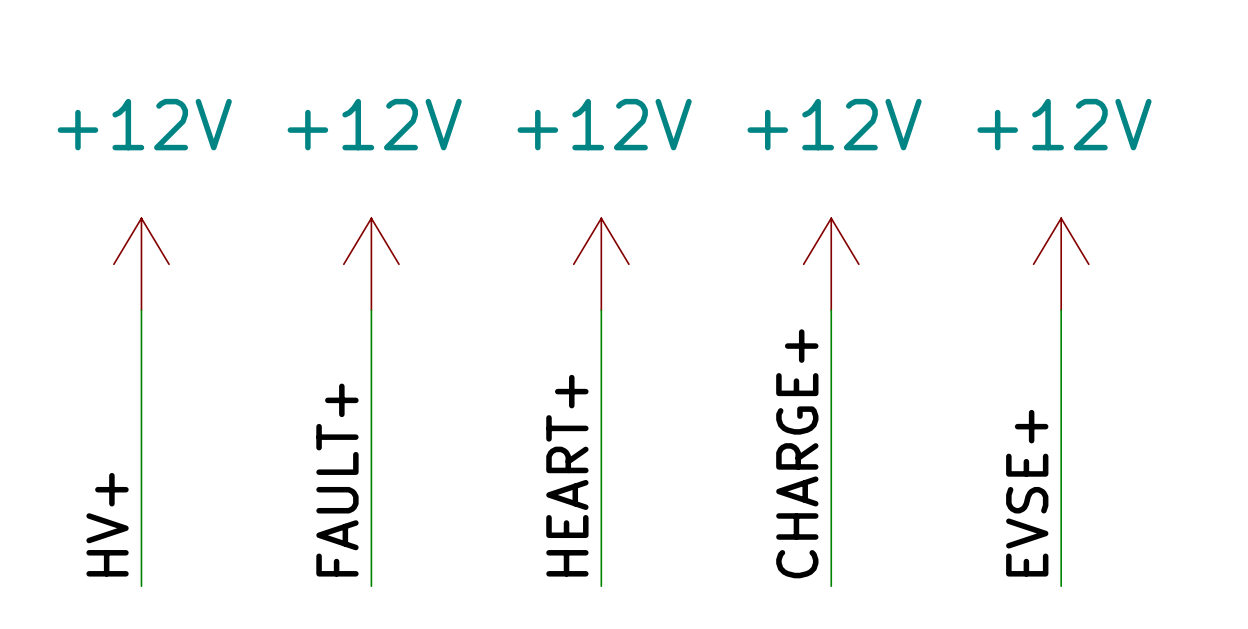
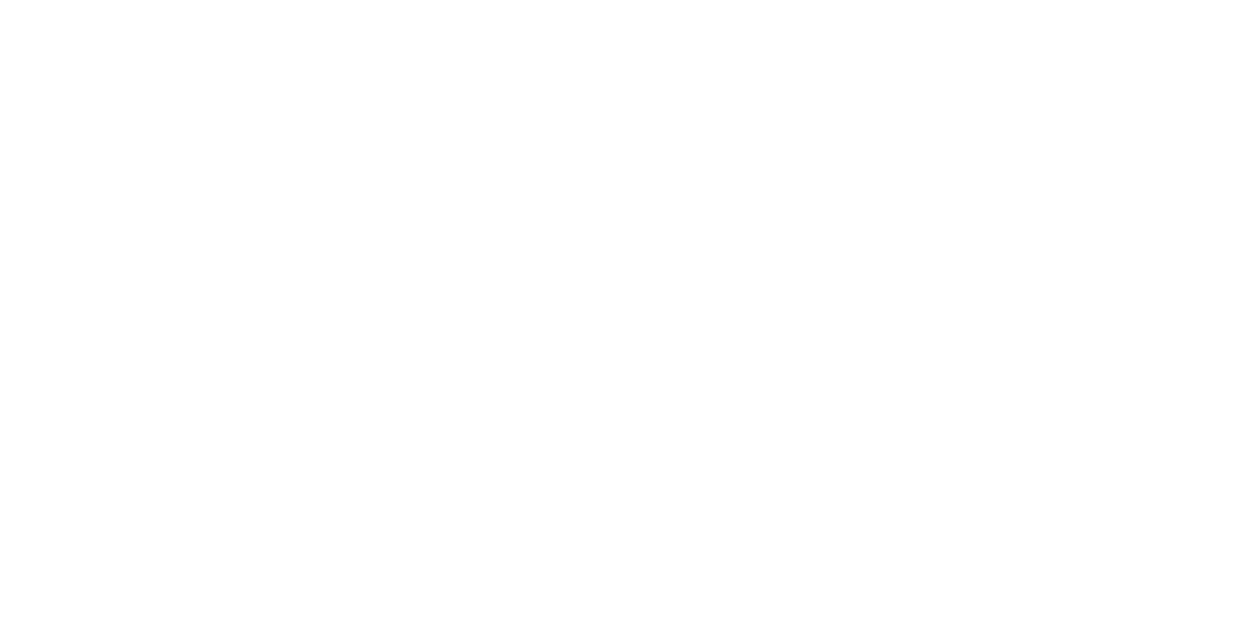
power symbol: +12V (141, 264) -> none
power symbol: +12V (371, 264) -> none
power symbol: +12V (601, 264) -> none
power symbol: +12V (831, 264) -> none
power symbol: +12V (1061, 264) -> none
wire: (141, 310) (141, 586) -> none
wire: (371, 310) (371, 586) -> none
wire: (601, 310) (601, 586) -> none
wire: (831, 310) (831, 586) -> none
wire: (1061, 310) (1061, 586) -> none
label: CHARGE+ (797, 453) -> none
label: HEART+ (567, 475) -> none
label: FAULT+ (337, 480) -> none
label: EVSE+ (1027, 493) -> none
label: HV+ (107, 524) -> none

